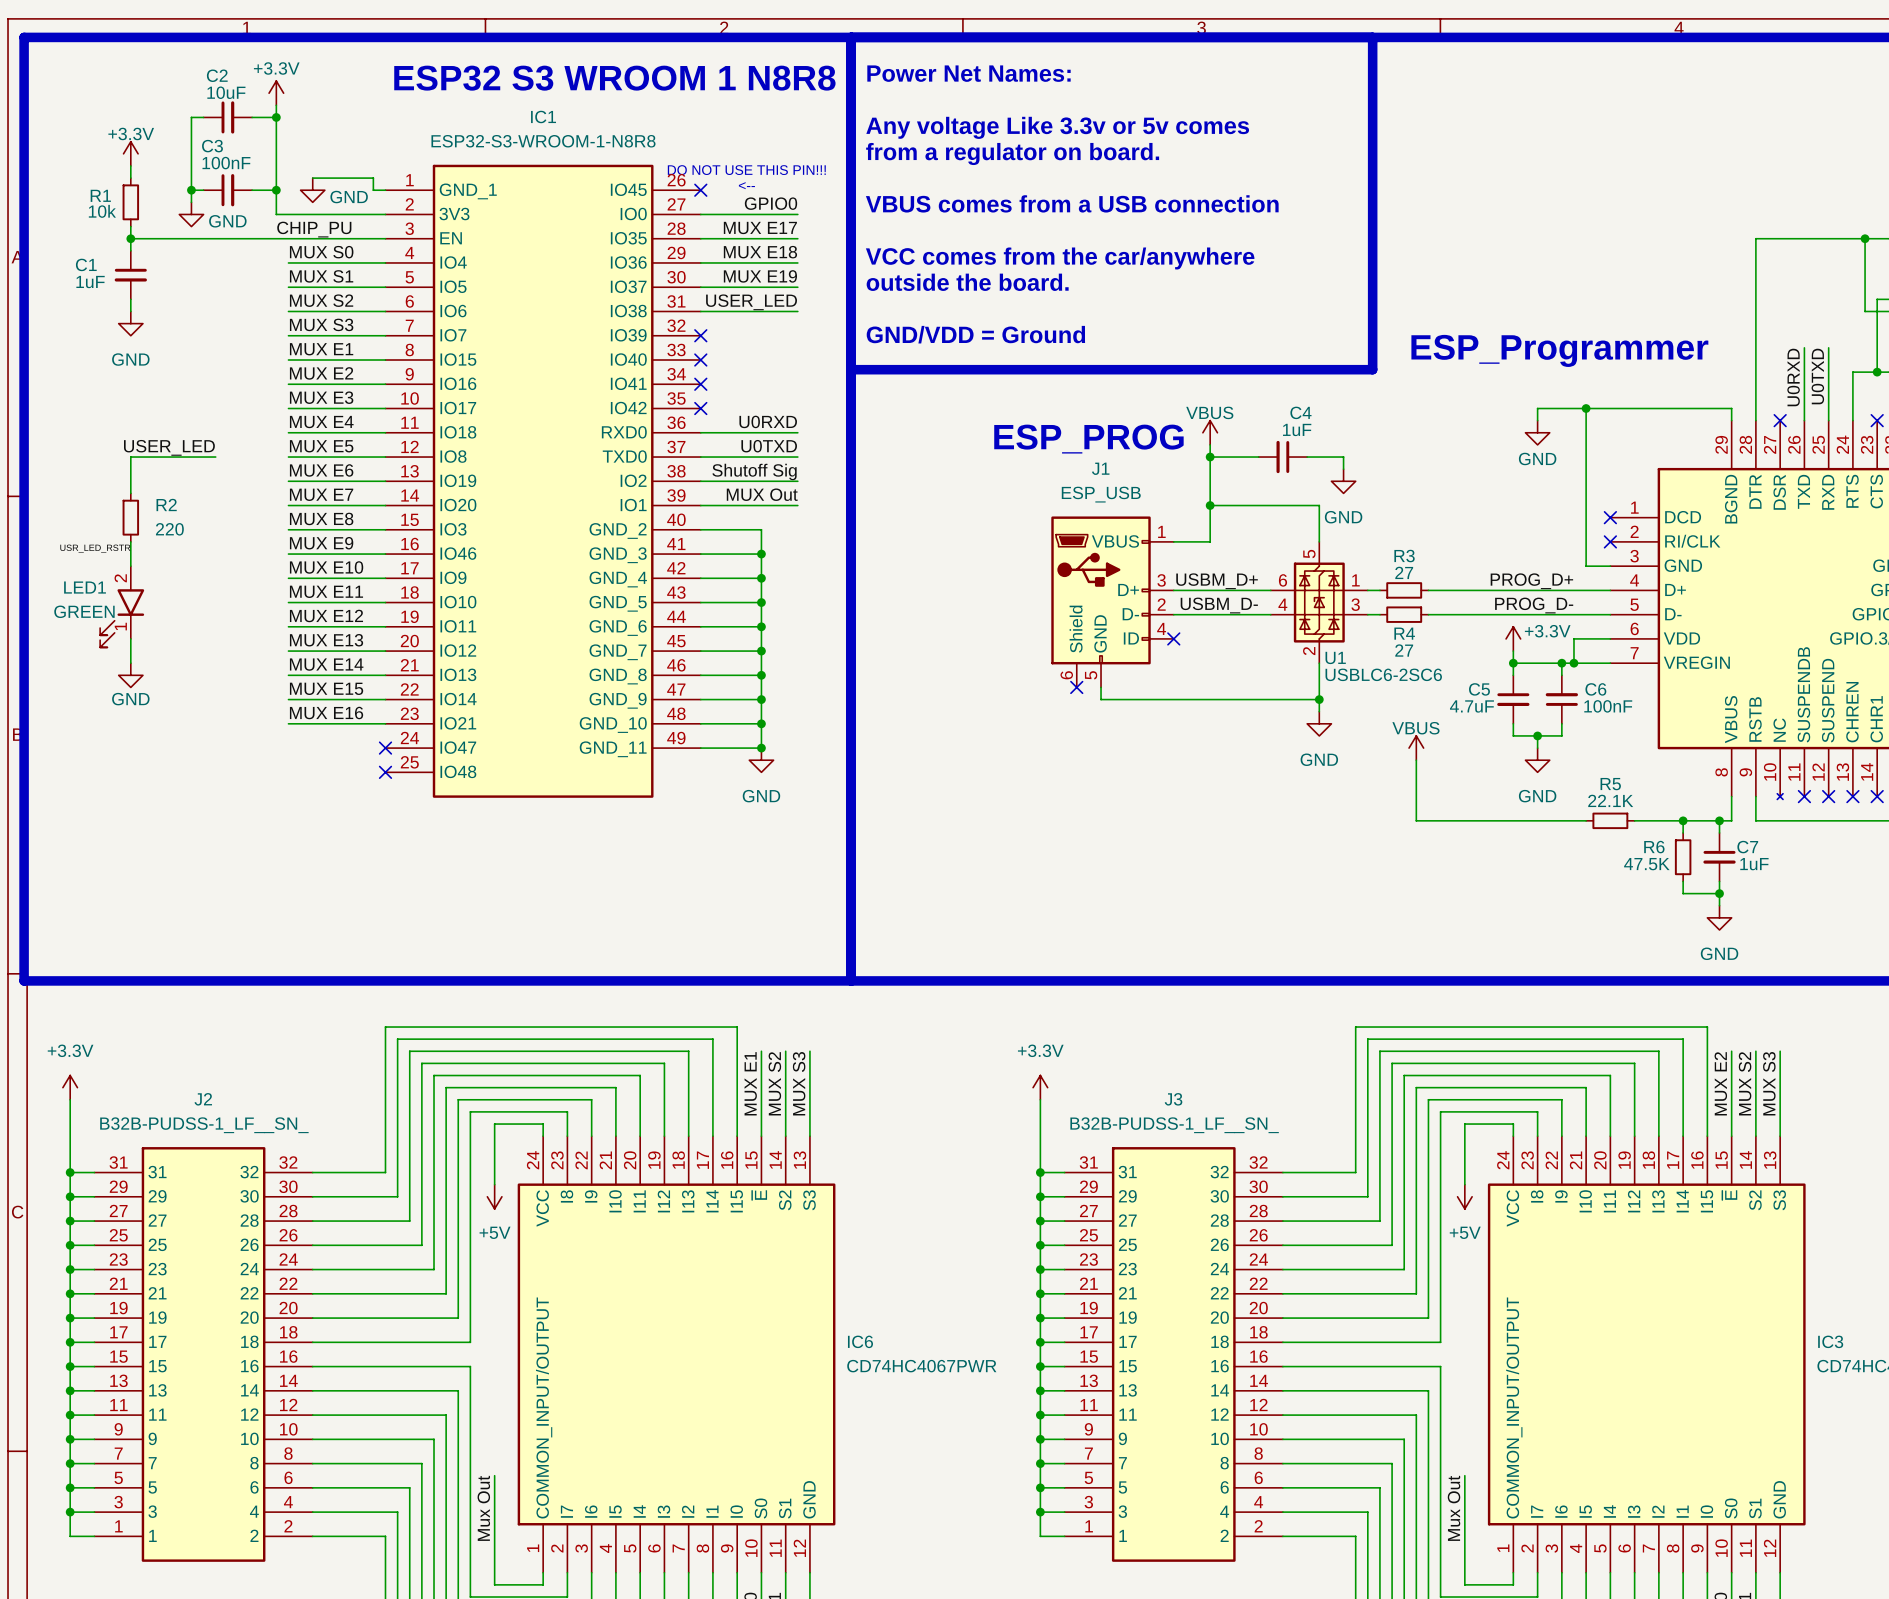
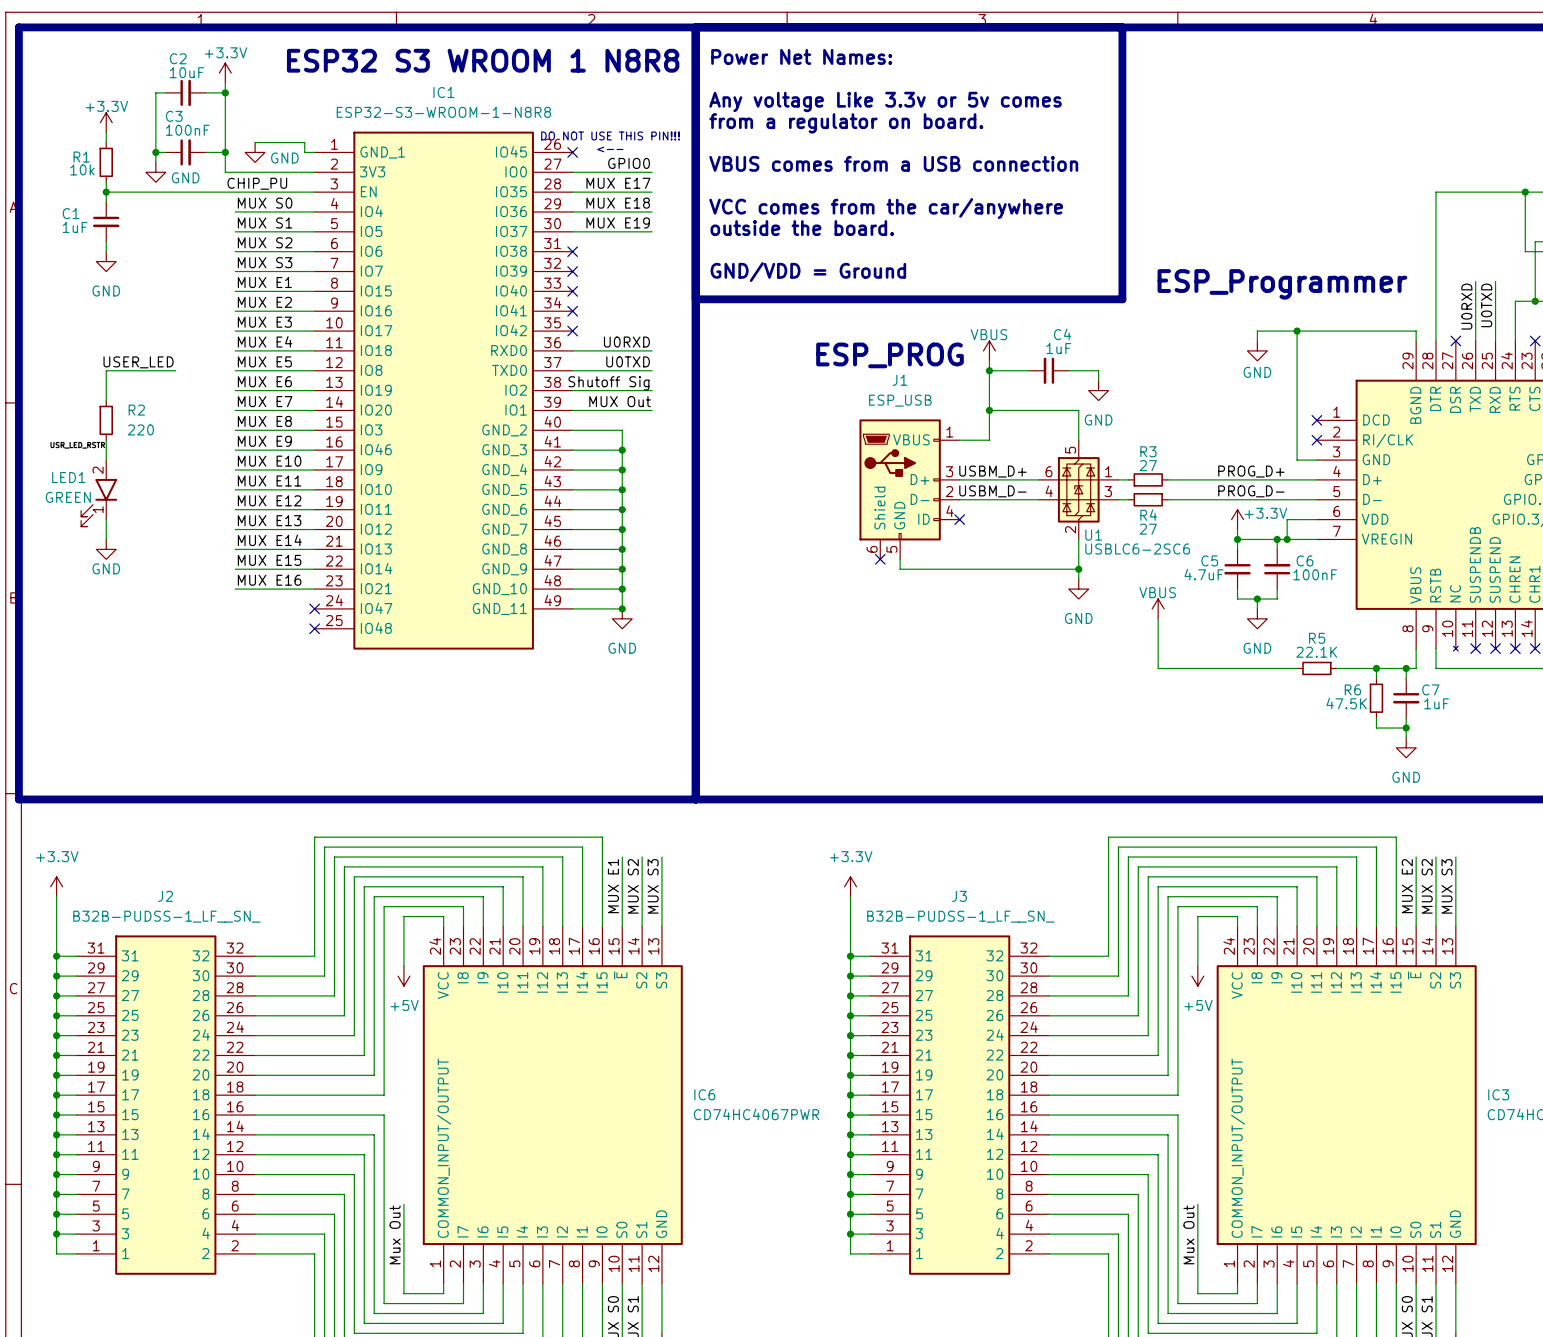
label: USER_LED (751, 302) -> none
wire: (700, 311) (797, 311) -> none
no-connect mark: none -> (572, 251)

